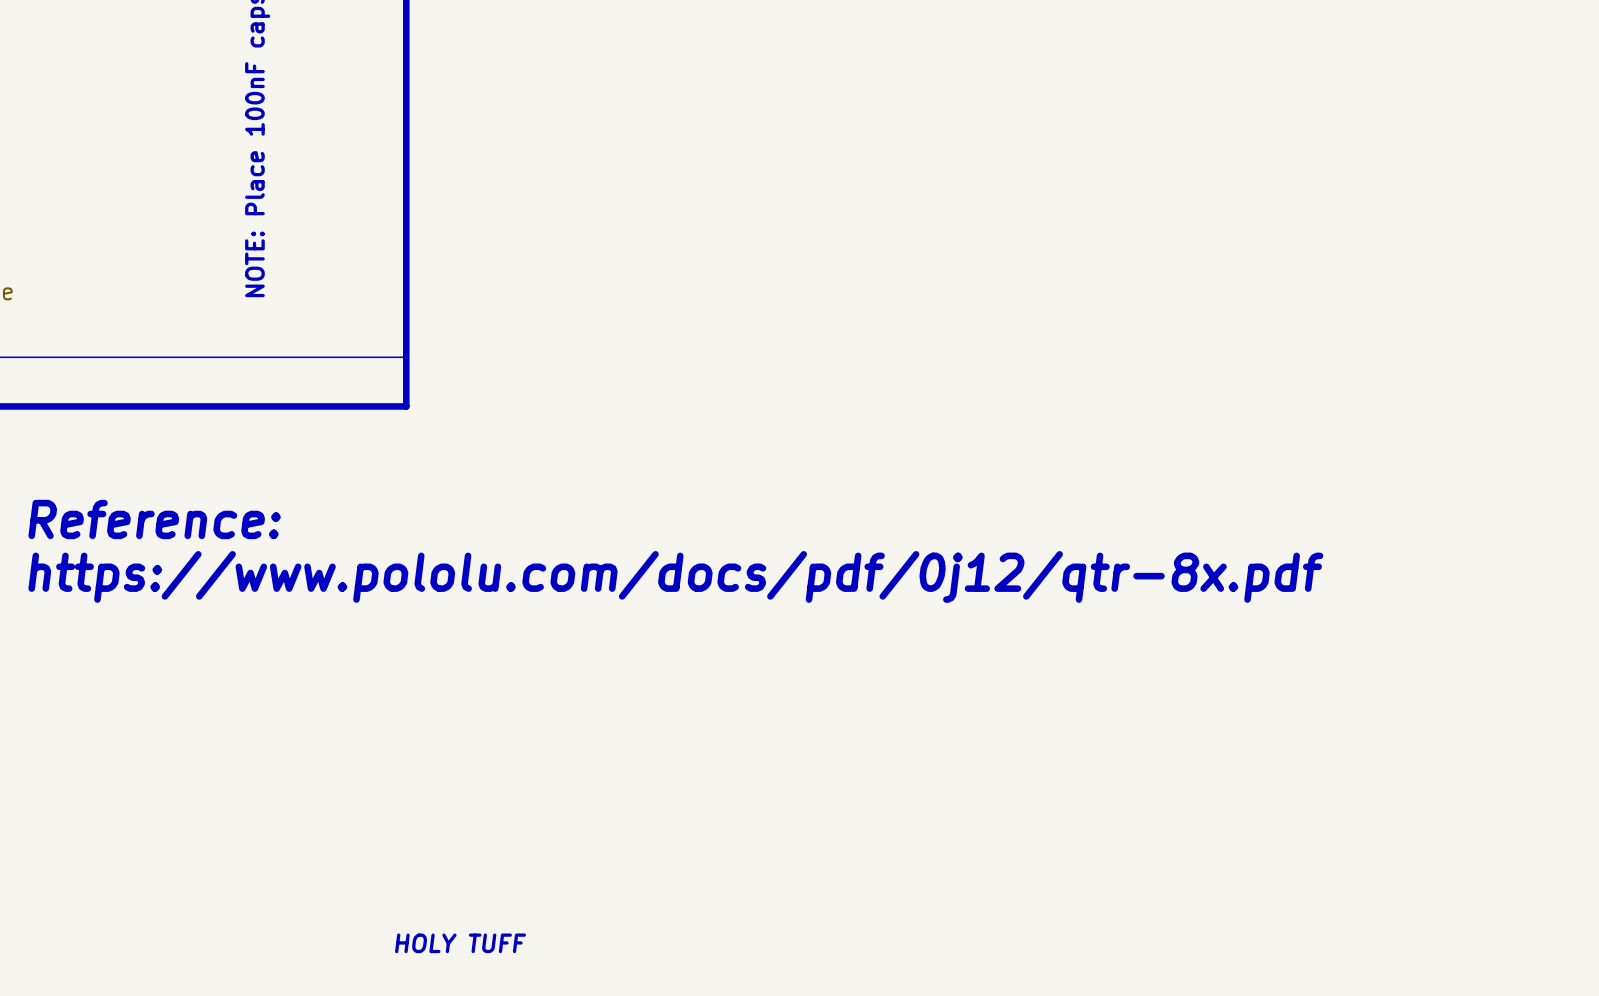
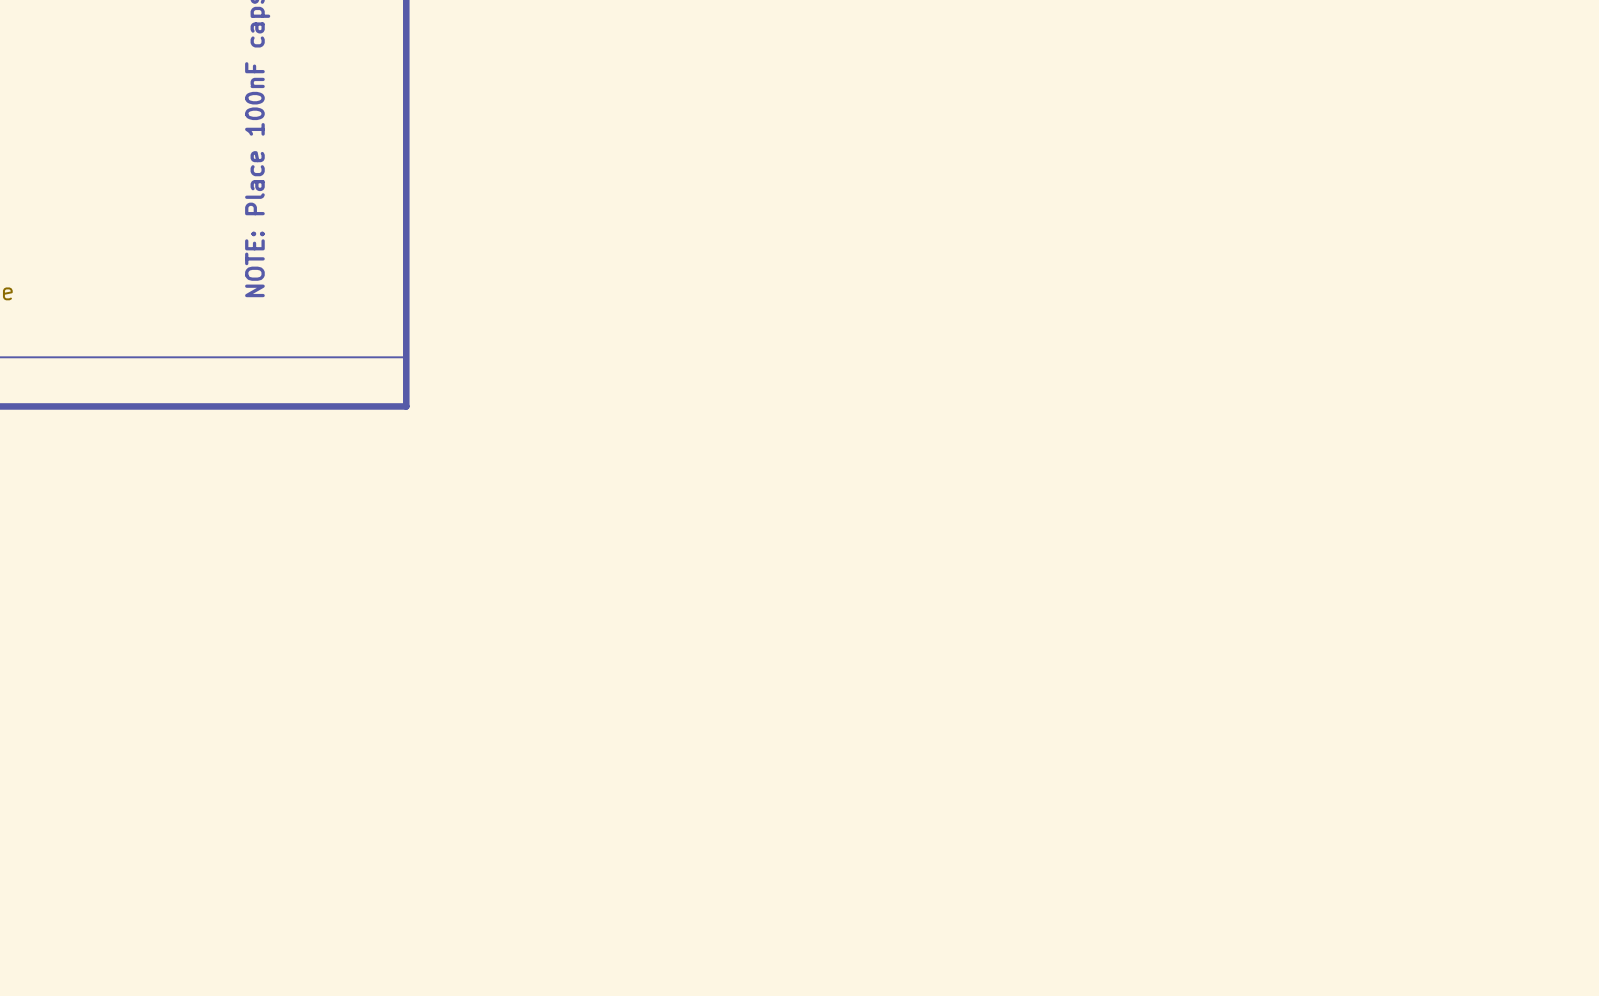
text: Reference: (154, 519) -> none
text: https://www.pololu.com/docs/pdf/0j12/qtr-8x.pdf (675, 576) -> none
text: HOLY TUFF (460, 943) -> none

